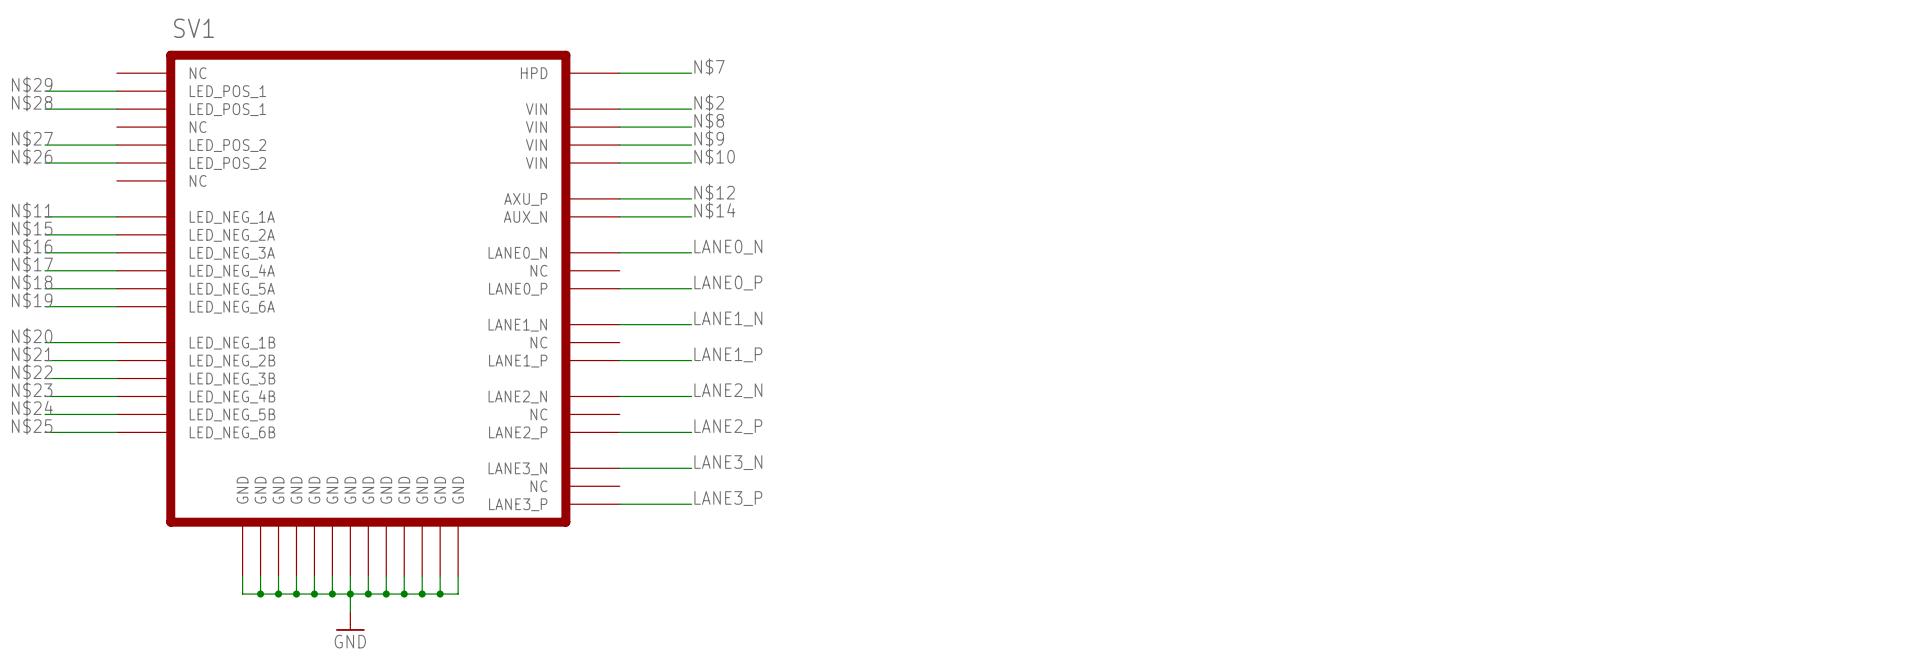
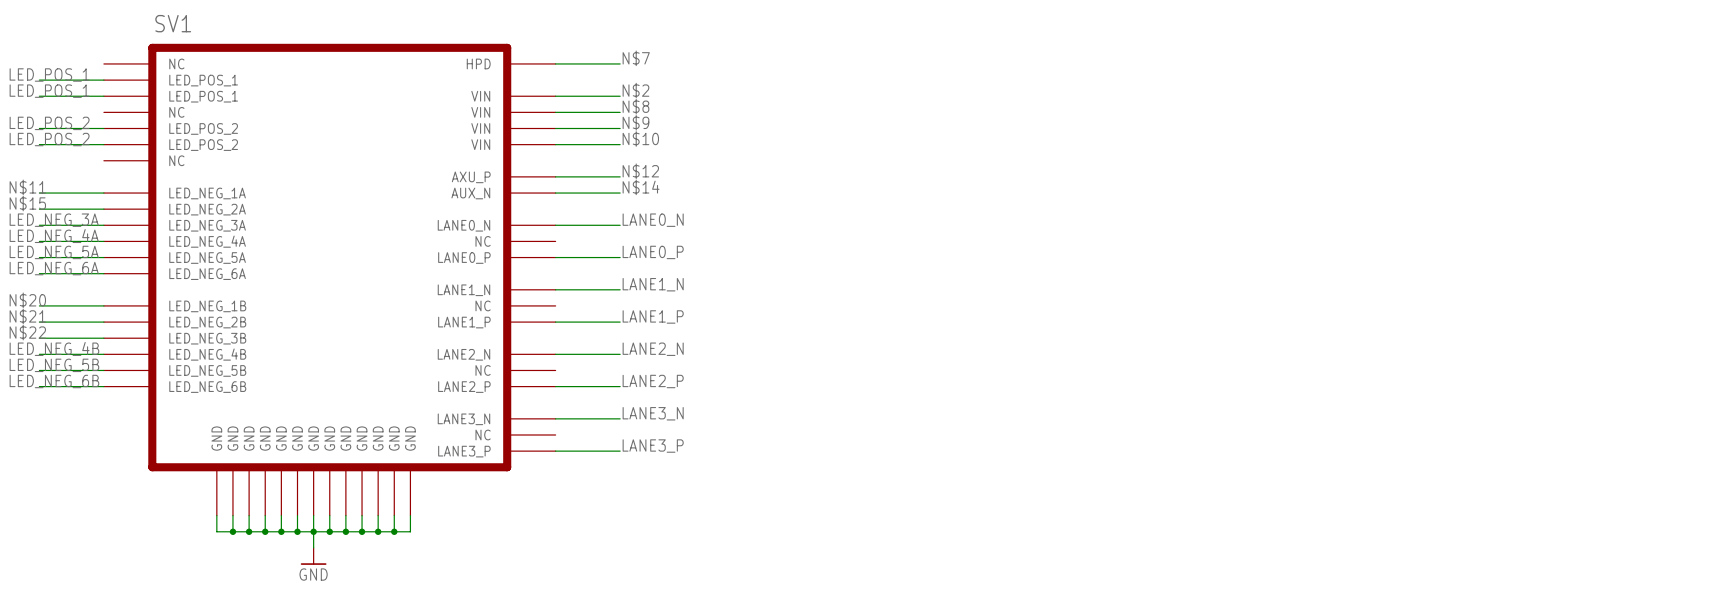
label: N$29 (32, 84) -> LED_POS_1 (49, 74)
label: N$28 (32, 102) -> LED_POS_1 (49, 91)
label: N$27 (32, 138) -> LED_POS_2 (49, 123)
label: N$26 (32, 156) -> LED_POS_2 (49, 139)
label: N$16 (32, 246) -> LED_NEG_3A (54, 220)
label: N$17 (32, 264) -> LED_NEG_4A (54, 236)
label: N$18 (32, 282) -> LED_NEG_5A (54, 252)
label: N$19 (32, 300) -> LED_NEG_6A (54, 268)
label: N$23 (32, 390) -> LED_NEG_4B (54, 348)
label: N$24 (32, 408) -> LED_NEG_5B (54, 365)
label: N$25 (32, 426) -> LED_NEG_6B (54, 381)

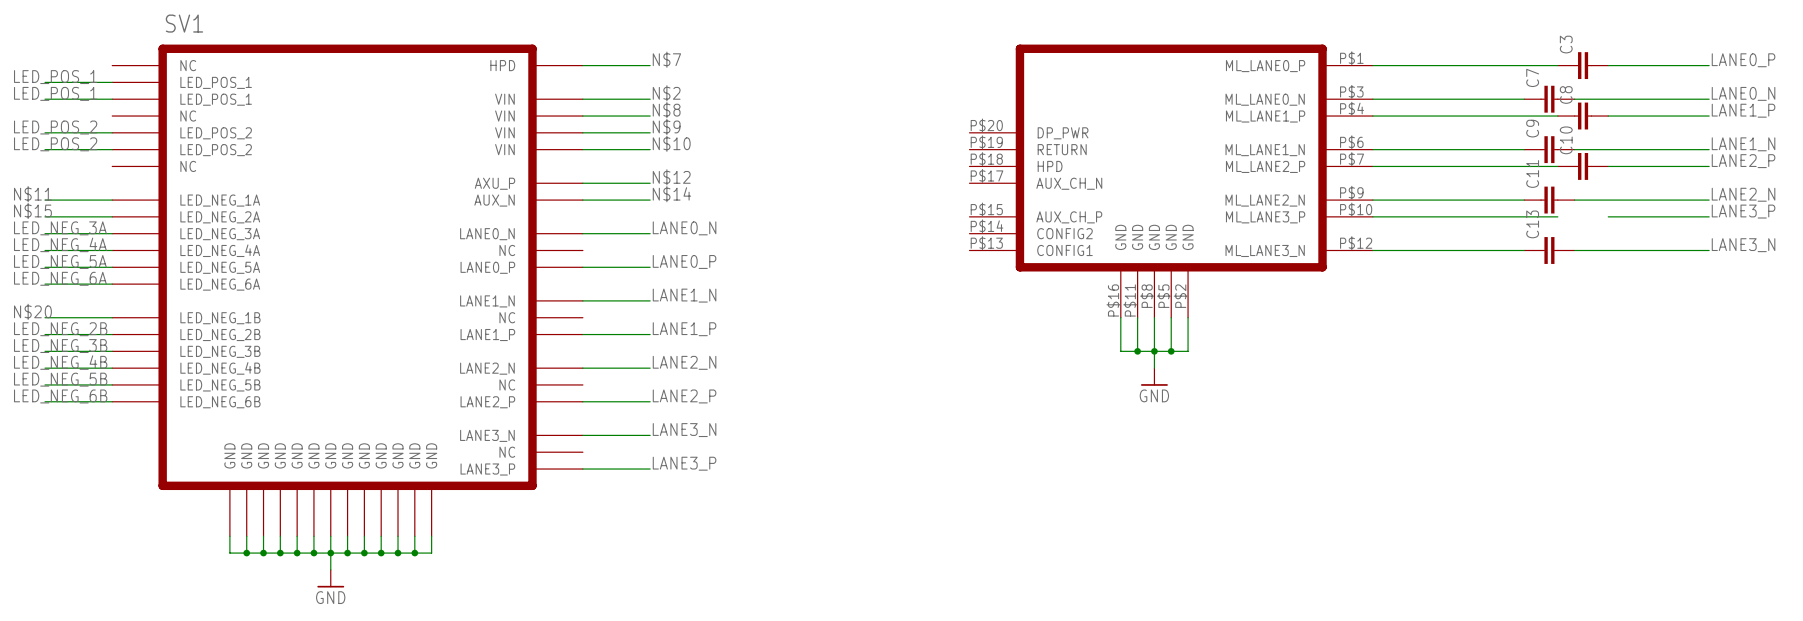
label: none -> LANE0_P (1743, 60)
wire: none -> (1372, 65) (1557, 65)
C3: none -> (1583, 65)
wire: none -> (1608, 65) (1709, 65)
label: none -> LANE0_N (1743, 93)
wire: none -> (1372, 99) (1524, 99)
C7: none -> (1549, 99)
wire: none -> (1574, 99) (1709, 99)
label: none -> LANE1_P (1743, 110)
wire: none -> (1372, 116) (1557, 116)
C8: none -> (1583, 116)
wire: none -> (1608, 116) (1709, 116)
label: none -> LANE1_N (1743, 144)
wire: none -> (1372, 149) (1524, 149)
C9: none -> (1549, 149)
wire: none -> (1574, 149) (1709, 149)
label: none -> LANE2_P (1743, 161)
wire: none -> (1372, 166) (1557, 166)
C10: none -> (1583, 166)
wire: none -> (1608, 166) (1709, 166)
part: none -> (1171, 181)
label: none -> LANE2_N (1743, 194)
wire: none -> (1372, 200) (1524, 200)
C11: none -> (1549, 200)
wire: none -> (1574, 200) (1709, 200)
label: none -> LANE3_P (1743, 211)
wire: none -> (1372, 216) (1557, 216)
wire: none -> (1608, 216) (1709, 216)
label: none -> LANE3_N (1743, 245)
wire: none -> (1372, 250) (1524, 250)
C13: none -> (1549, 250)
wire: none -> (1574, 250) (1709, 250)
wire: none -> (1120, 317) (1120, 351) (1188, 351) (1188, 317)
wire: none -> (1137, 317) (1137, 351)
wire: none -> (1154, 317) (1154, 368)
wire: none -> (1171, 317) (1171, 351)
label: N$21 (27, 316) -> LED_NEG_2B (60, 329)
label: N$22 (27, 332) -> LED_NEG_3B (60, 346)
junction: none -> (1137, 351)
junction: none -> (1154, 351)
junction: none -> (1171, 351)
power symbol: none -> GND (1154, 376)

